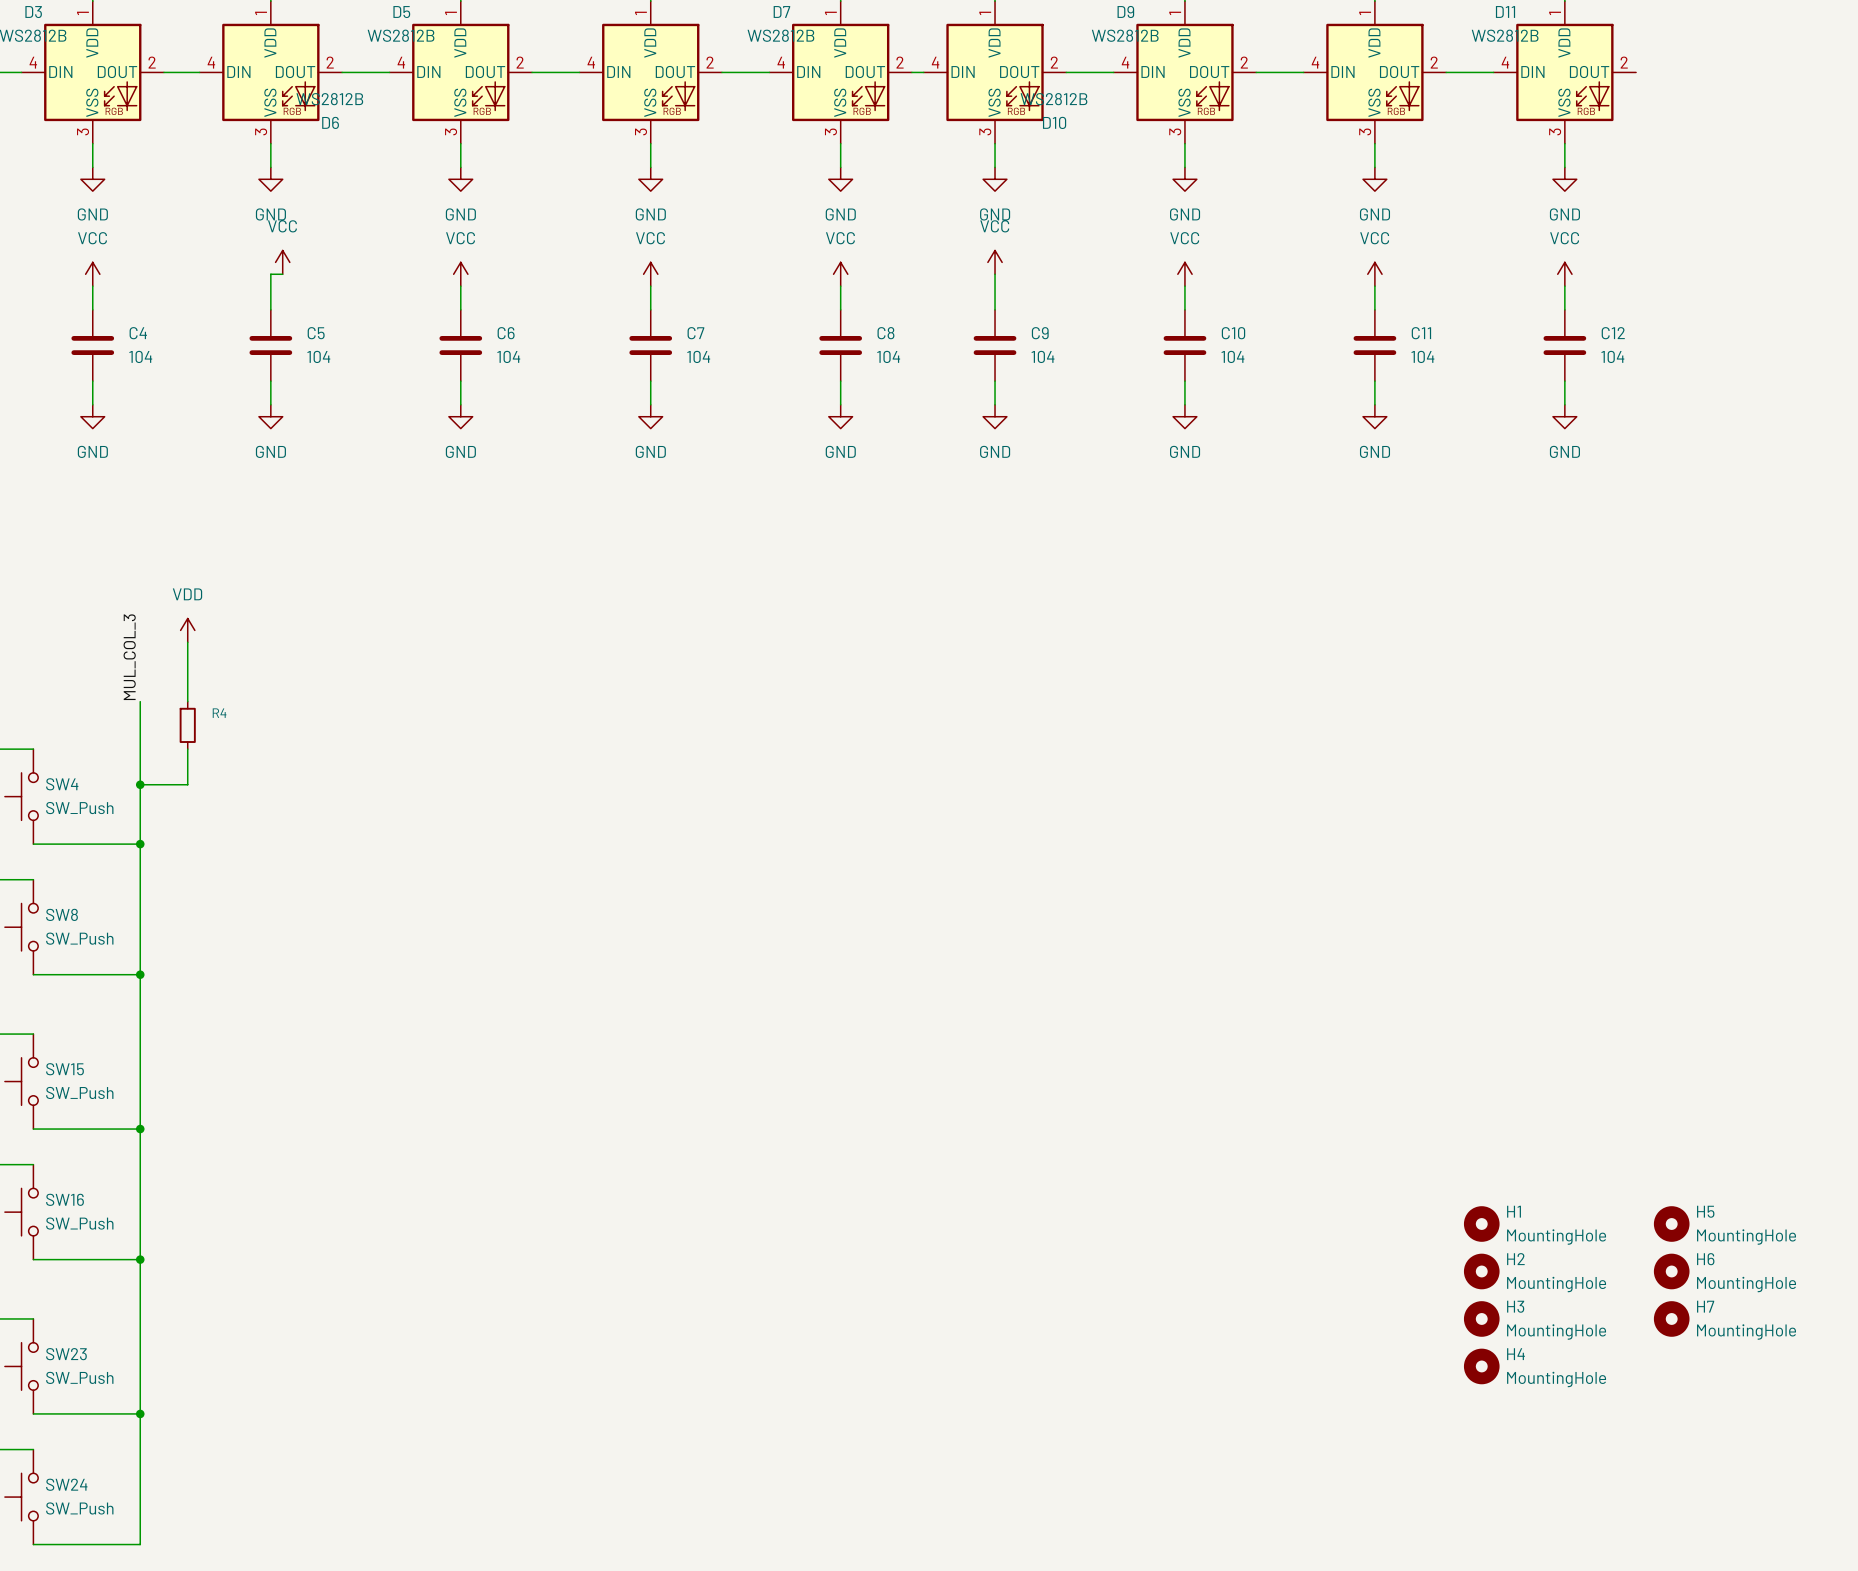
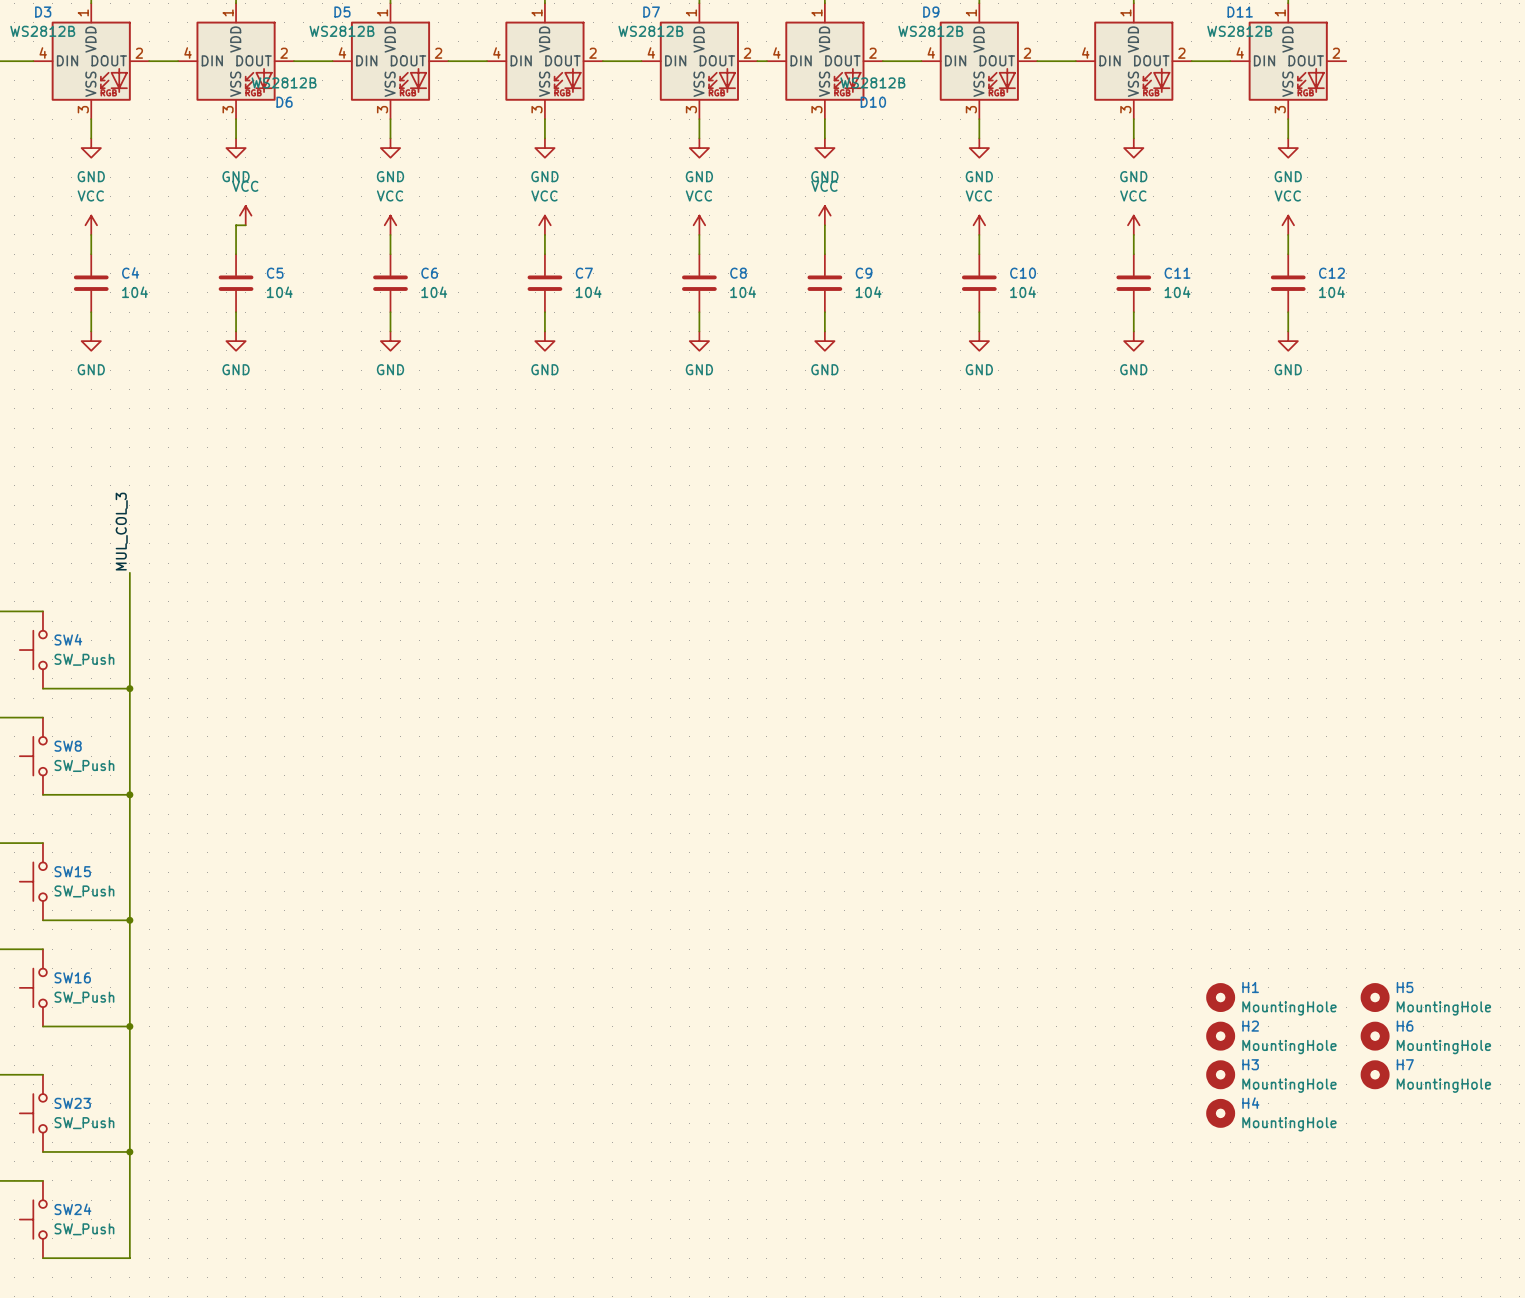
power symbol: VDD (187, 630) -> none
wire: (187, 642) (187, 701) -> none
R4: (187, 725) -> none
wire: (187, 749) (187, 784) (140, 784) -> none
junction: (140, 784) -> none

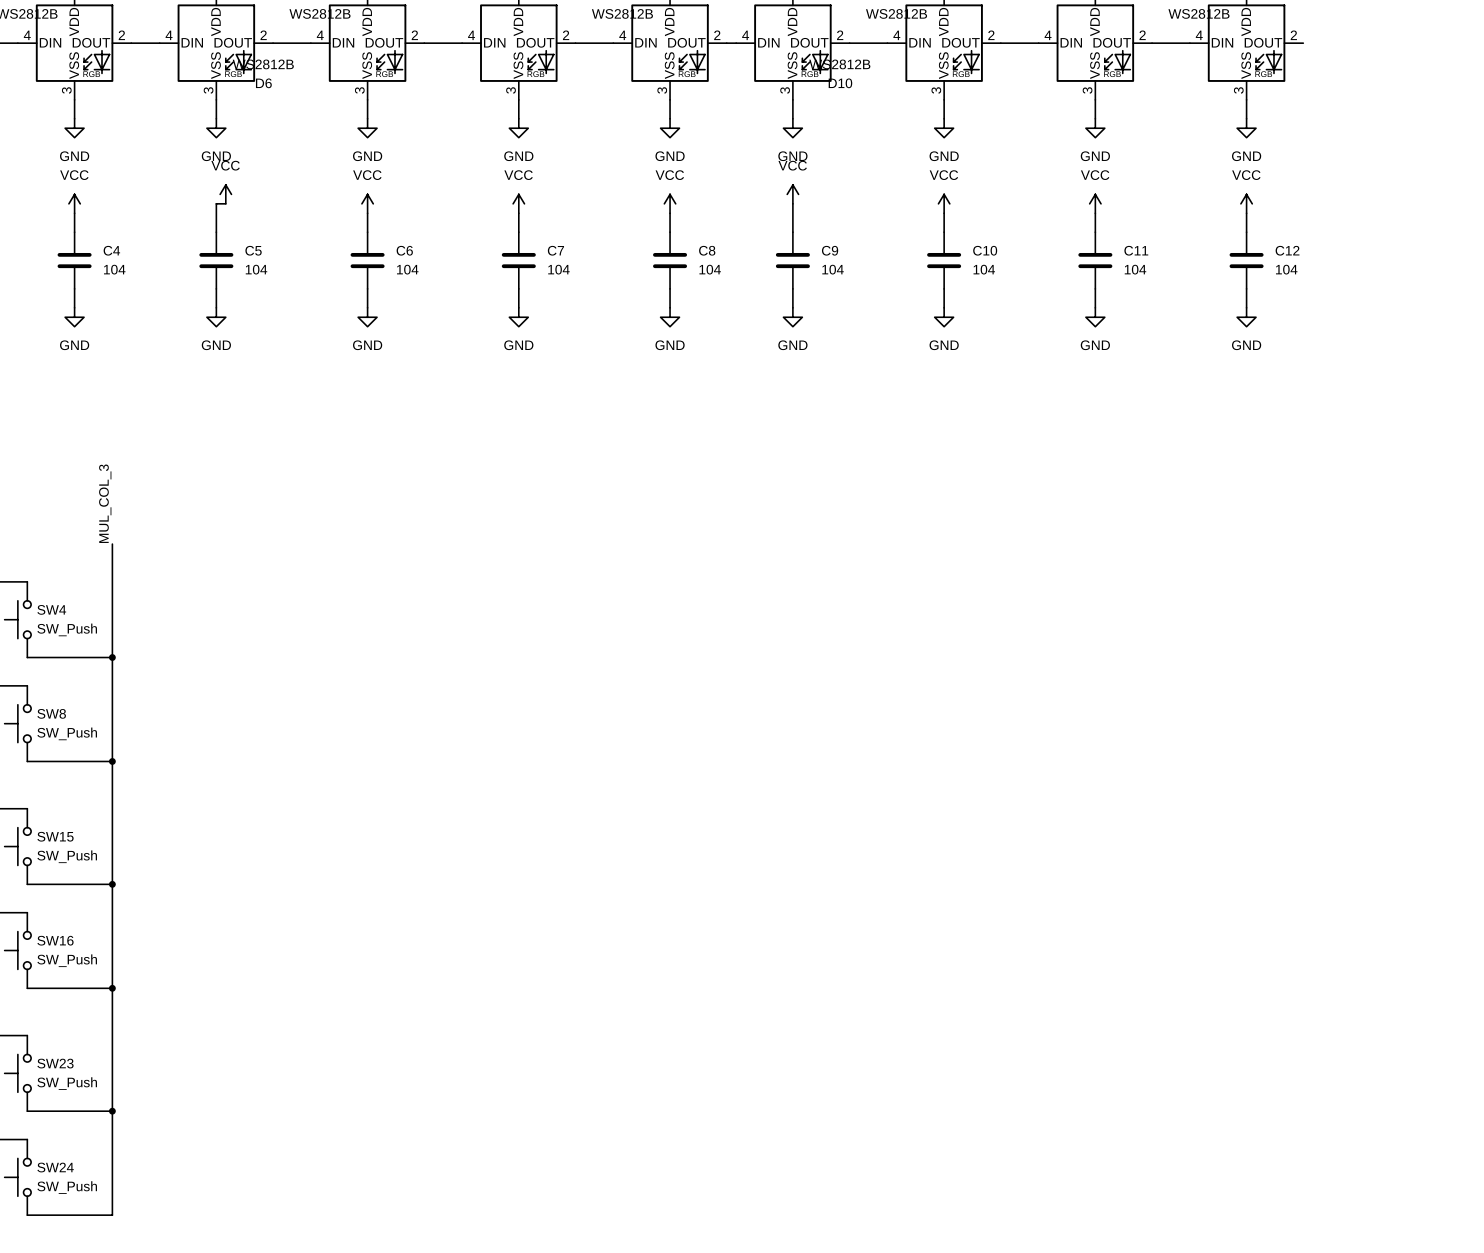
H1: MountingHole (1220, 997) -> none
H5: MountingHole (1375, 997) -> none
H2: MountingHole (1220, 1036) -> none
H6: MountingHole (1375, 1036) -> none
H3: MountingHole (1220, 1074) -> none
H7: MountingHole (1375, 1074) -> none
H4: MountingHole (1220, 1113) -> none

